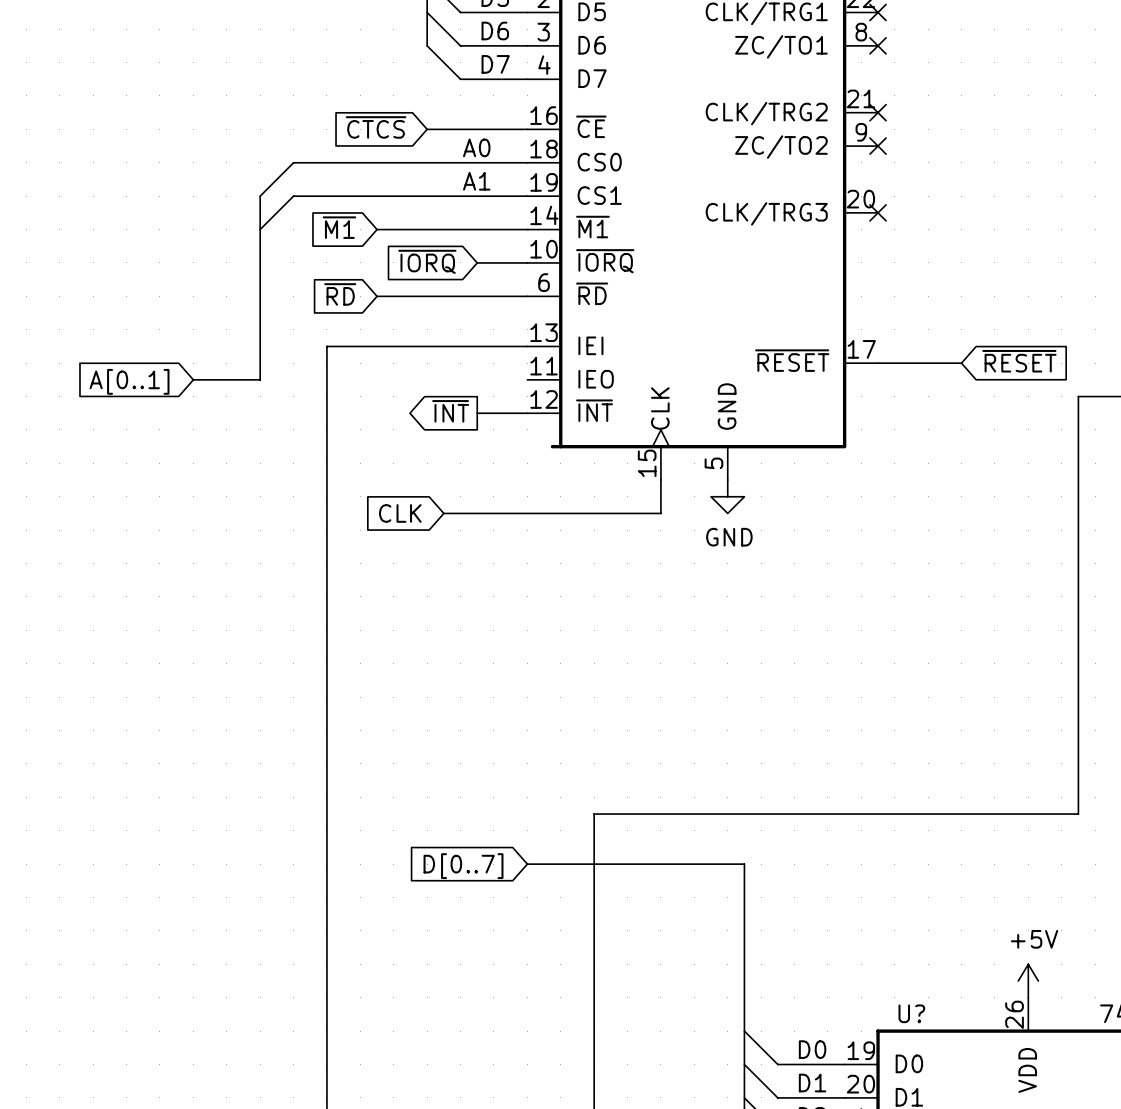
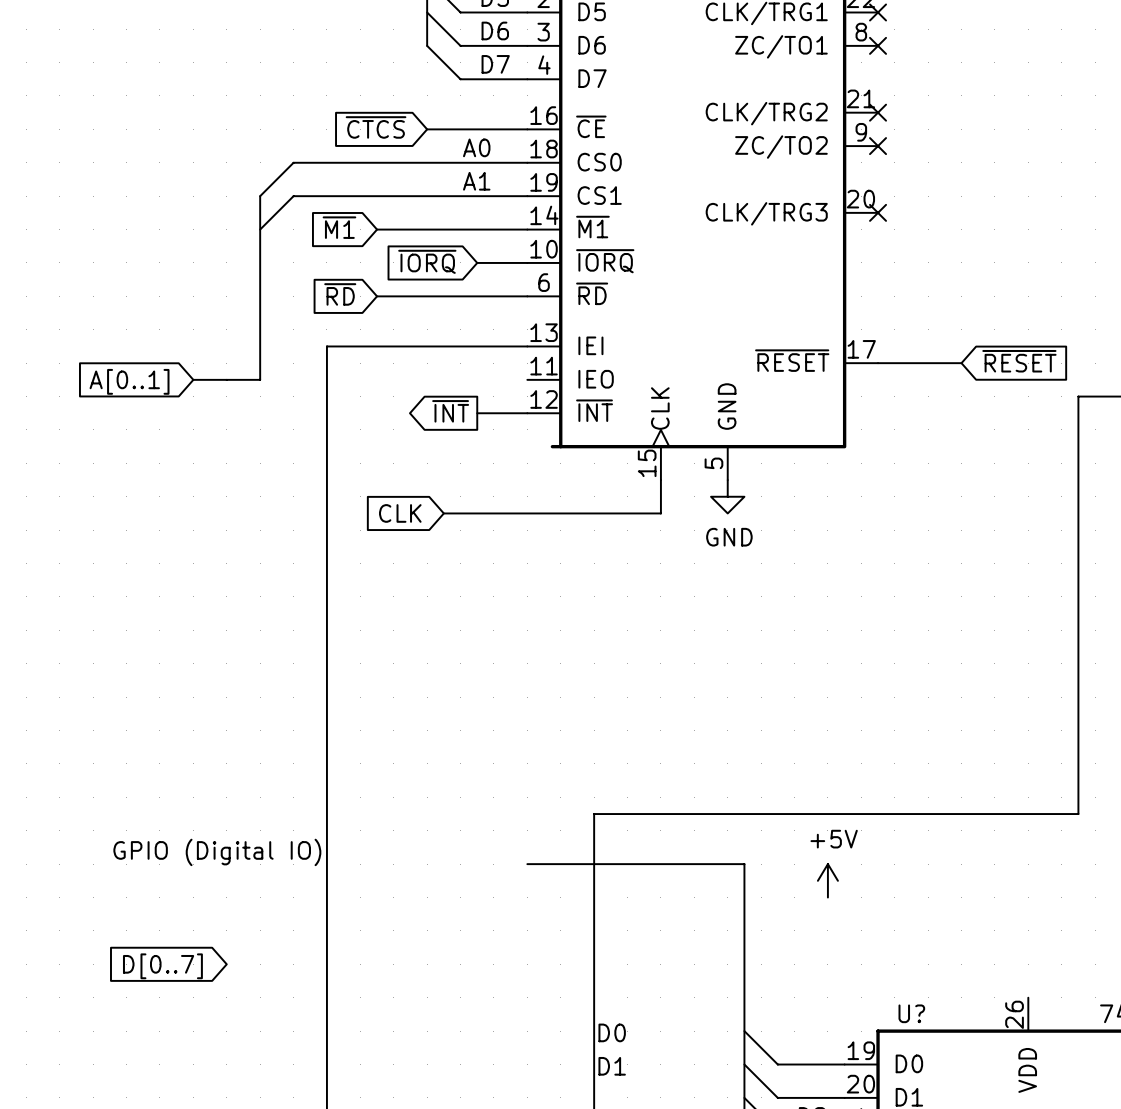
text: none -> GPIO (Digital IO) (217, 852)
global label position: D[0..7] (463, 866) -> D[0..7] (162, 966)
power symbol position: +5V (1028, 981) -> +5V (827, 880)
label position: D0 (812, 1049) -> D0 (612, 1032)
label position: D1 (812, 1083) -> D1 (612, 1066)

